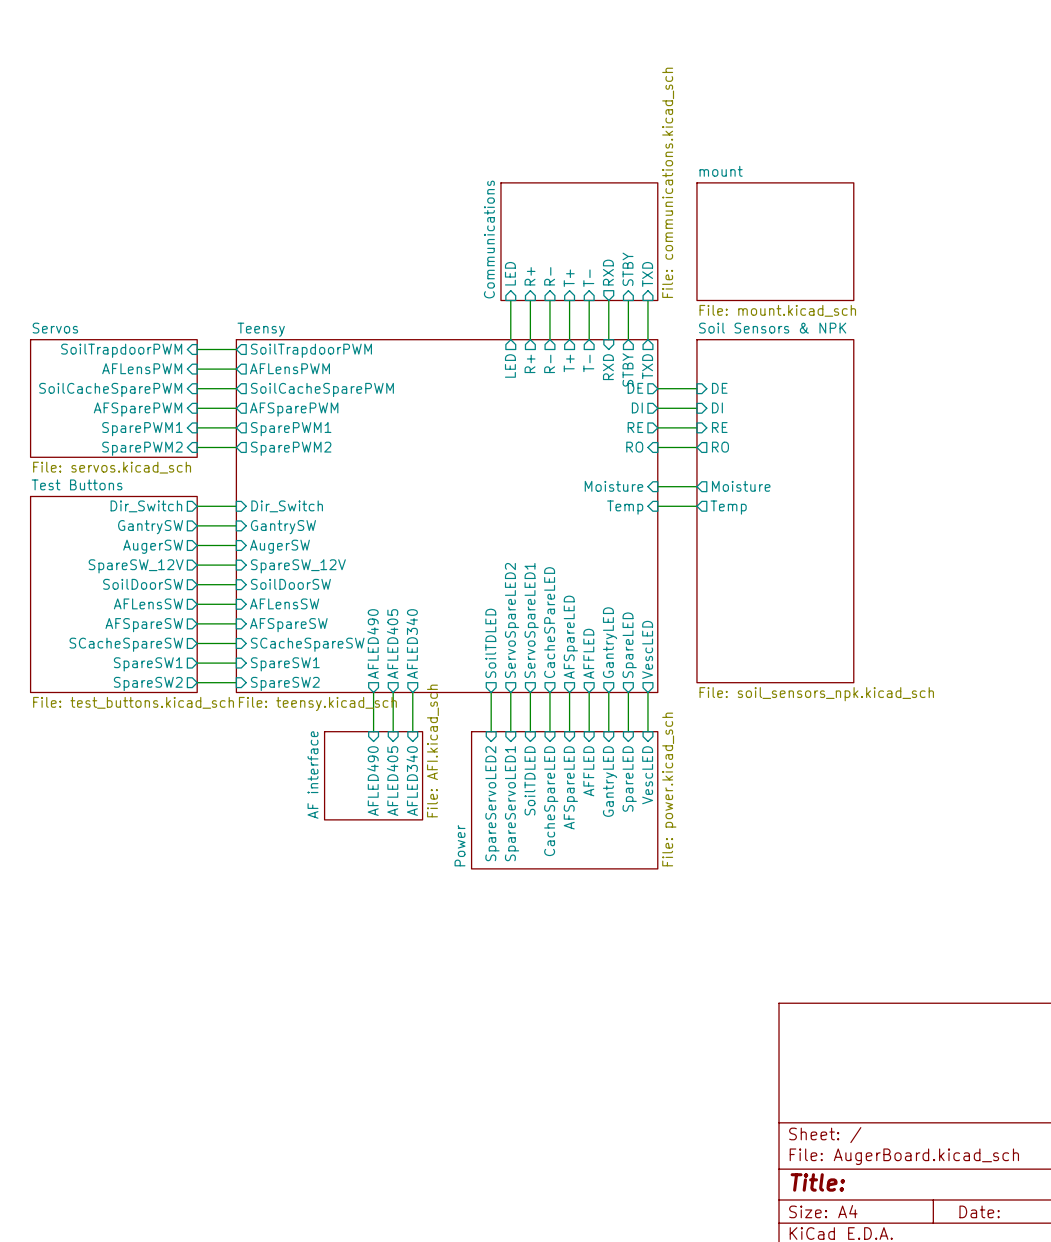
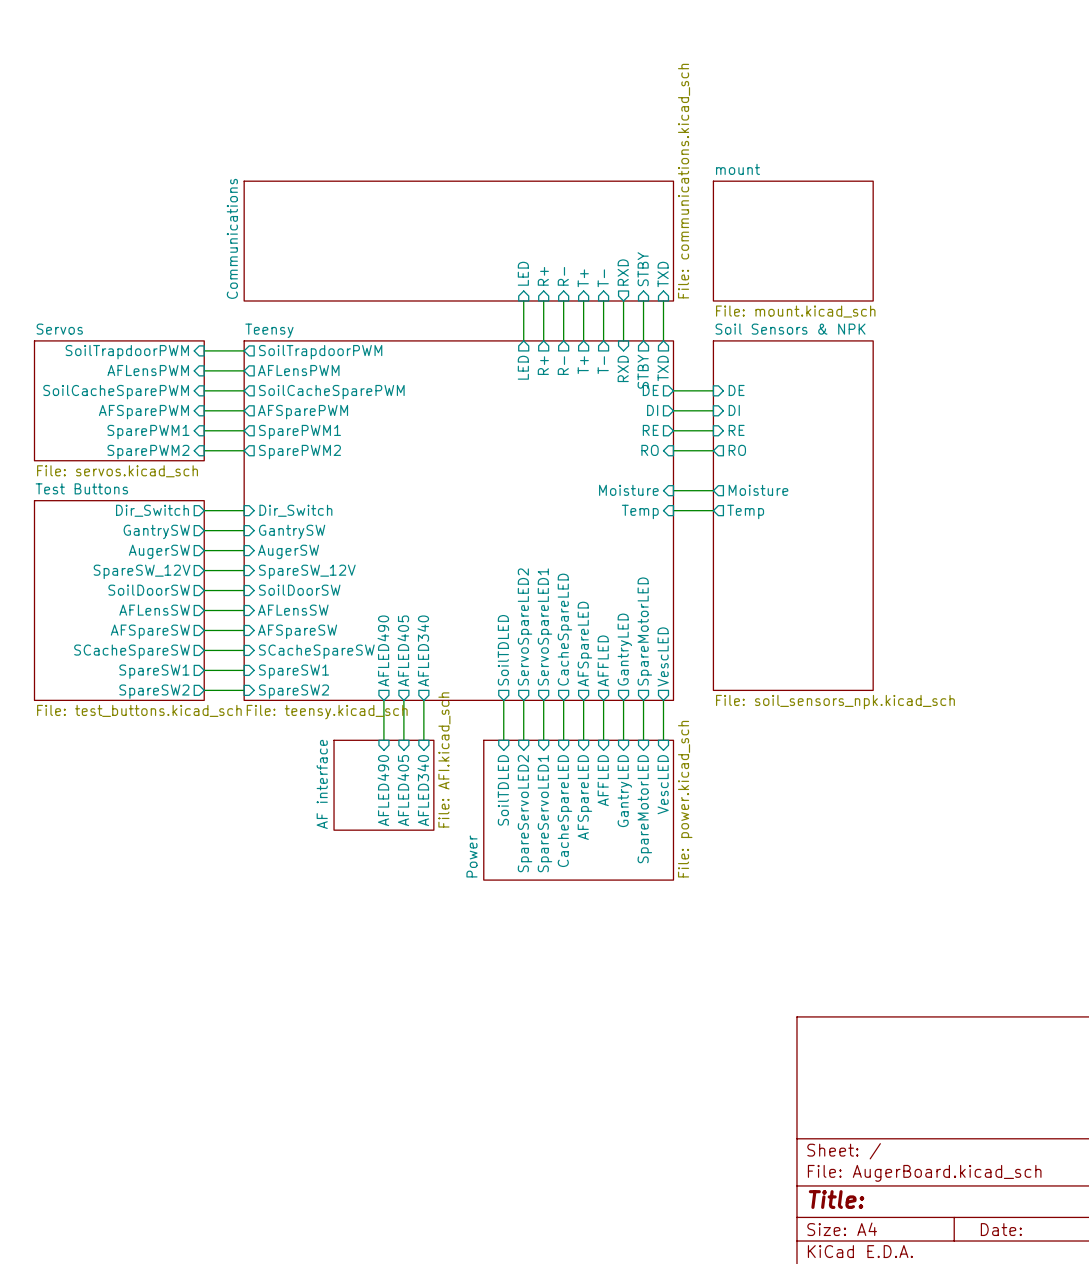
sheet Communications: none -> File: communications.kicad_sch (458, 241)
sheet Communications: File: communications.kicad_sch (579, 241) -> none
sheet pin: CacheSPareLED (549, 622) -> CacheSpareLED (564, 629)
sheet pin: SpareLED (629, 645) -> SpareMotorLED (644, 631)
sheet pin: SpareLED (629, 778) -> SpareMotorLED (644, 809)
sheet pin: SoilTDLED (530, 780) -> SpareServoLED1 (544, 813)
sheet pin: SpareServoLED2 (492, 803) -> SoilTDLED (503, 790)
sheet pin: SpareServoLED1 (512, 803) -> SpareServoLED2 (525, 813)

